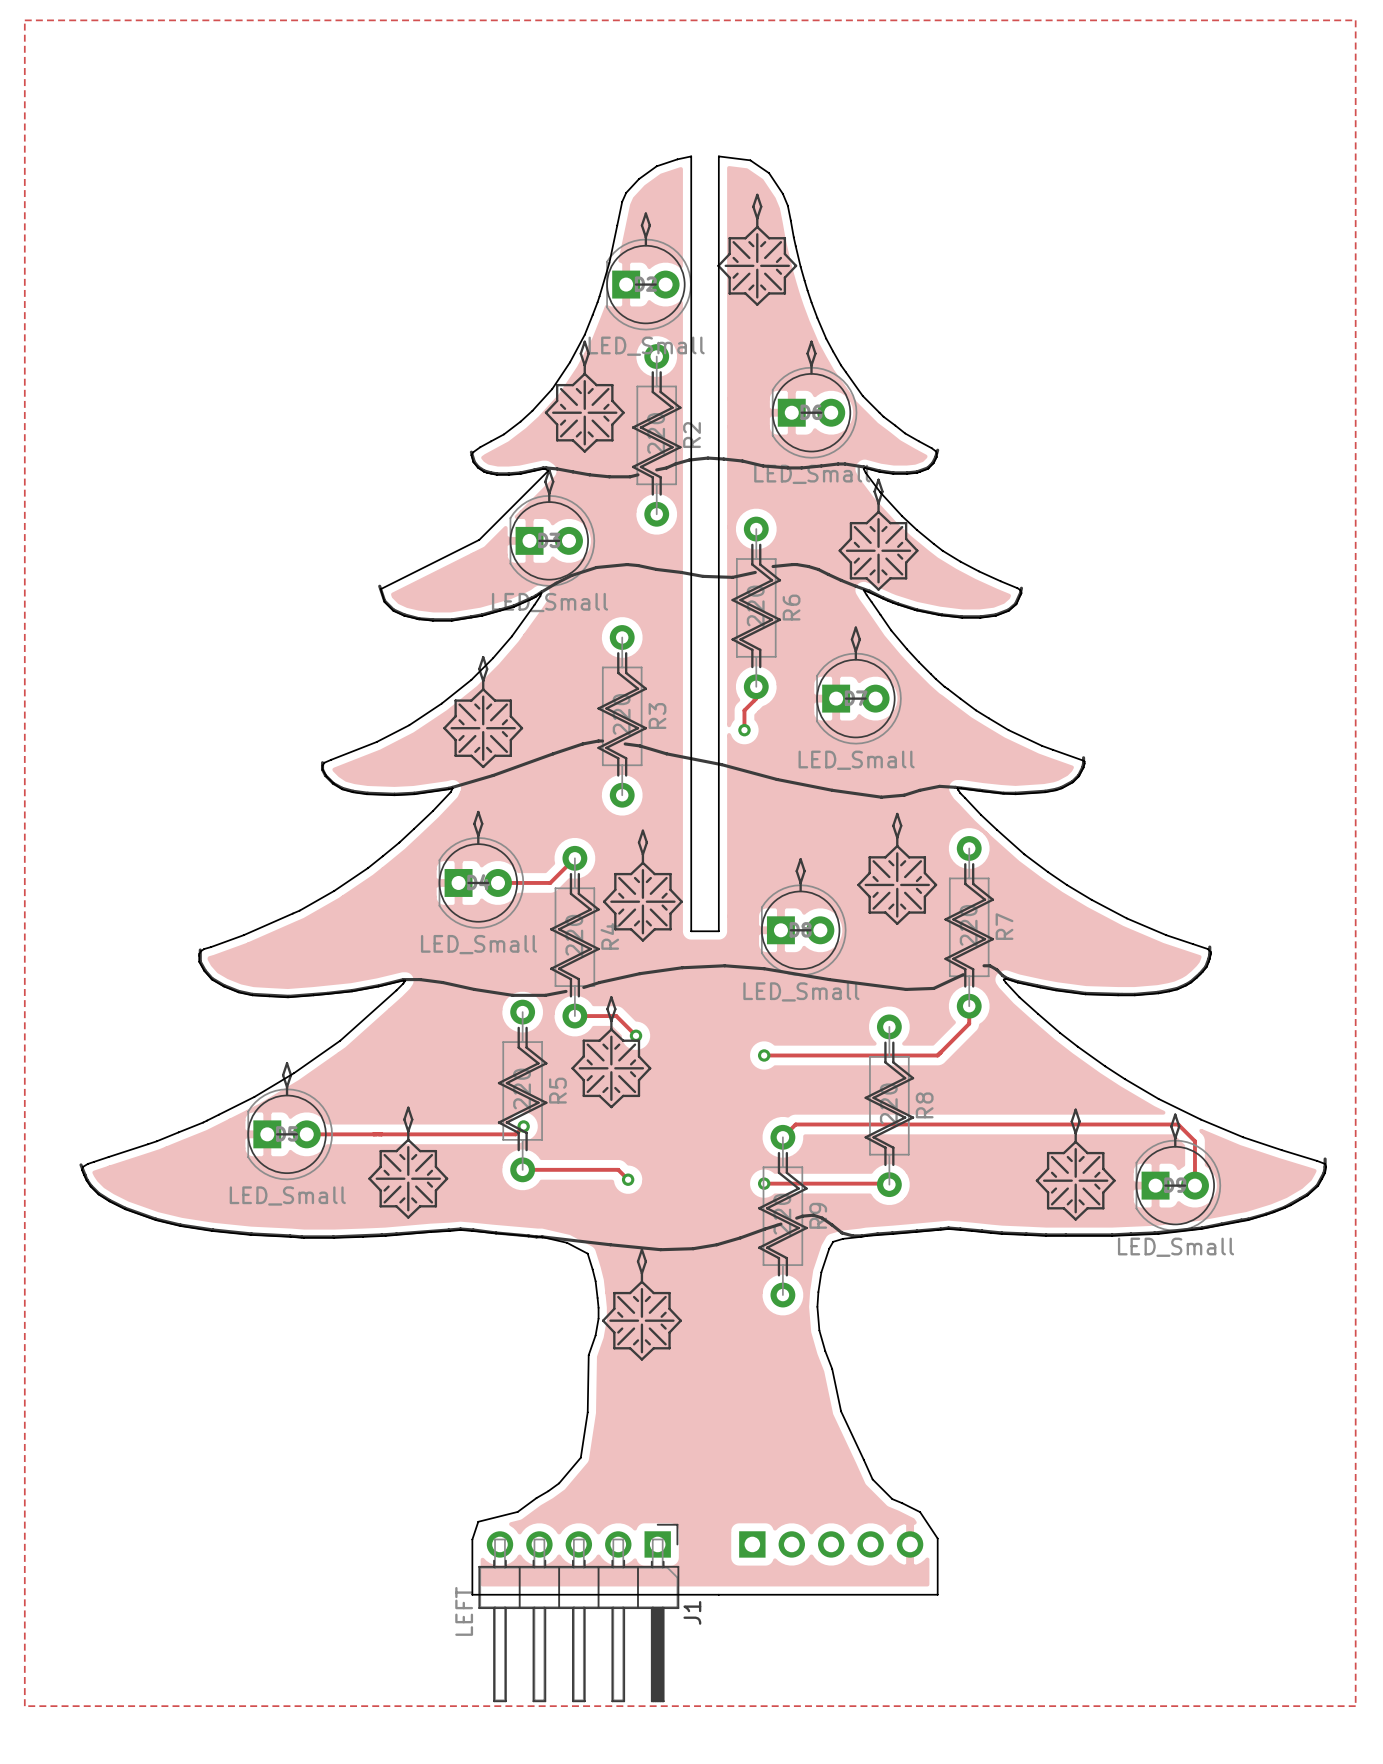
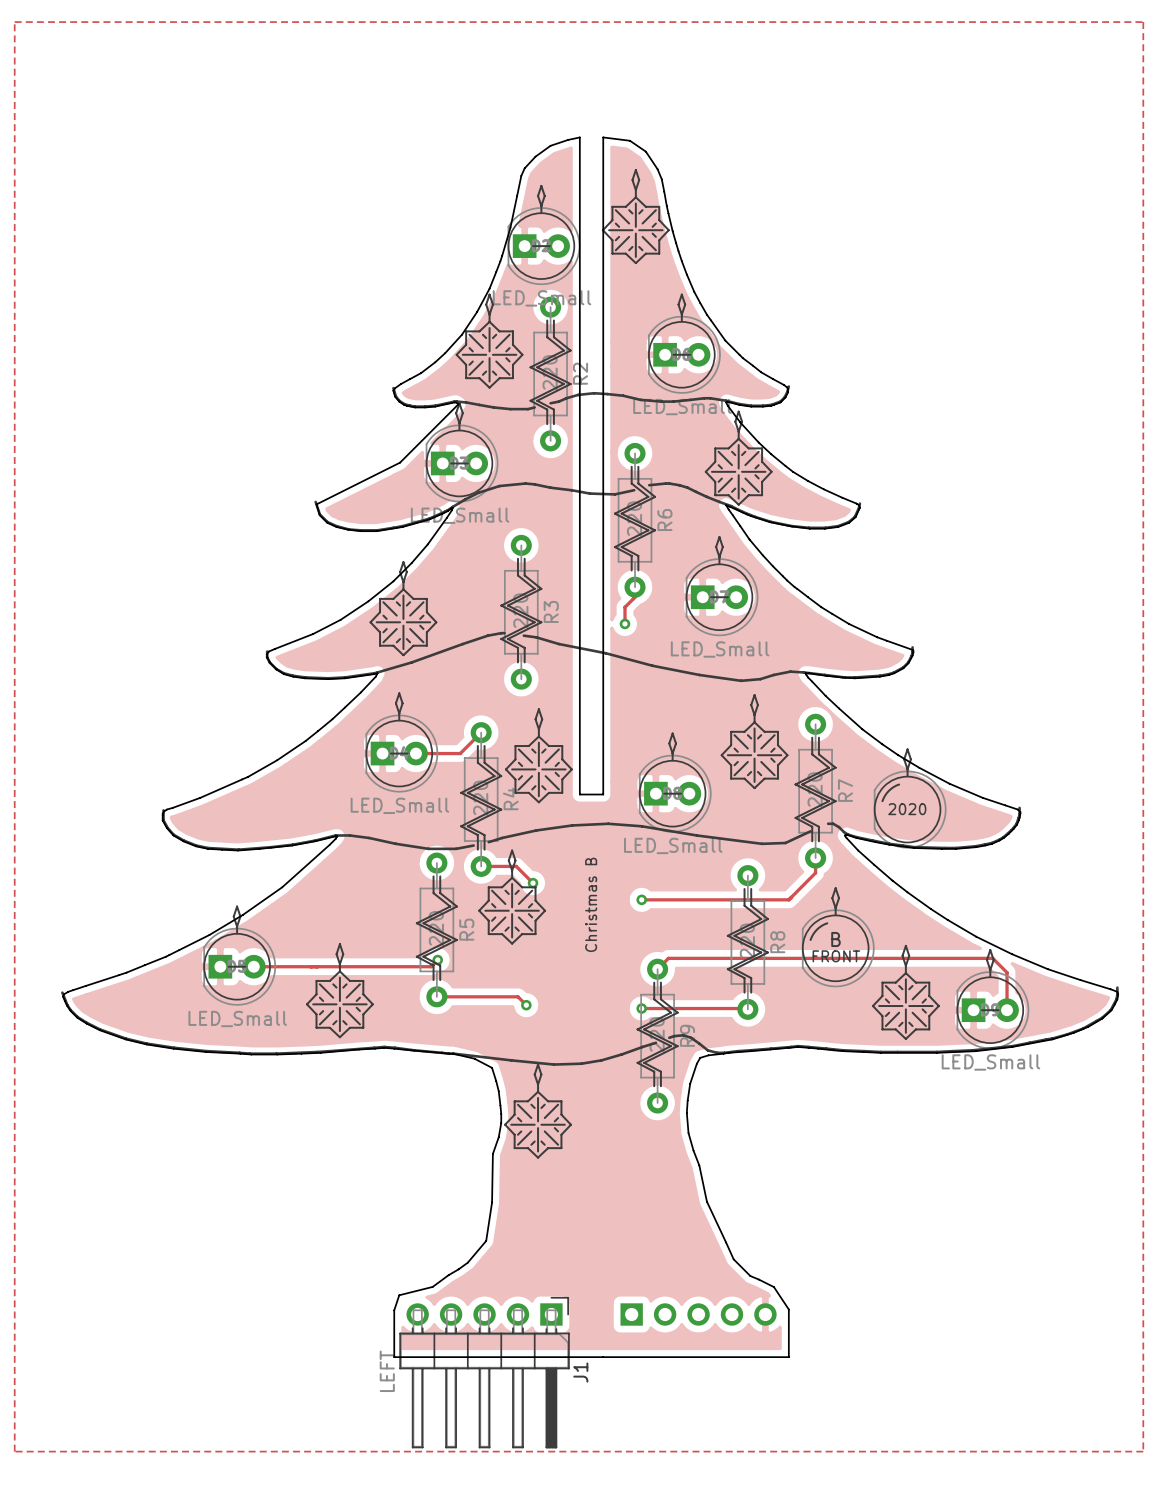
drawing: none -> [873, 748, 947, 849]
drawing: none -> [802, 887, 875, 988]
text: none -> Christmas B (591, 904)

